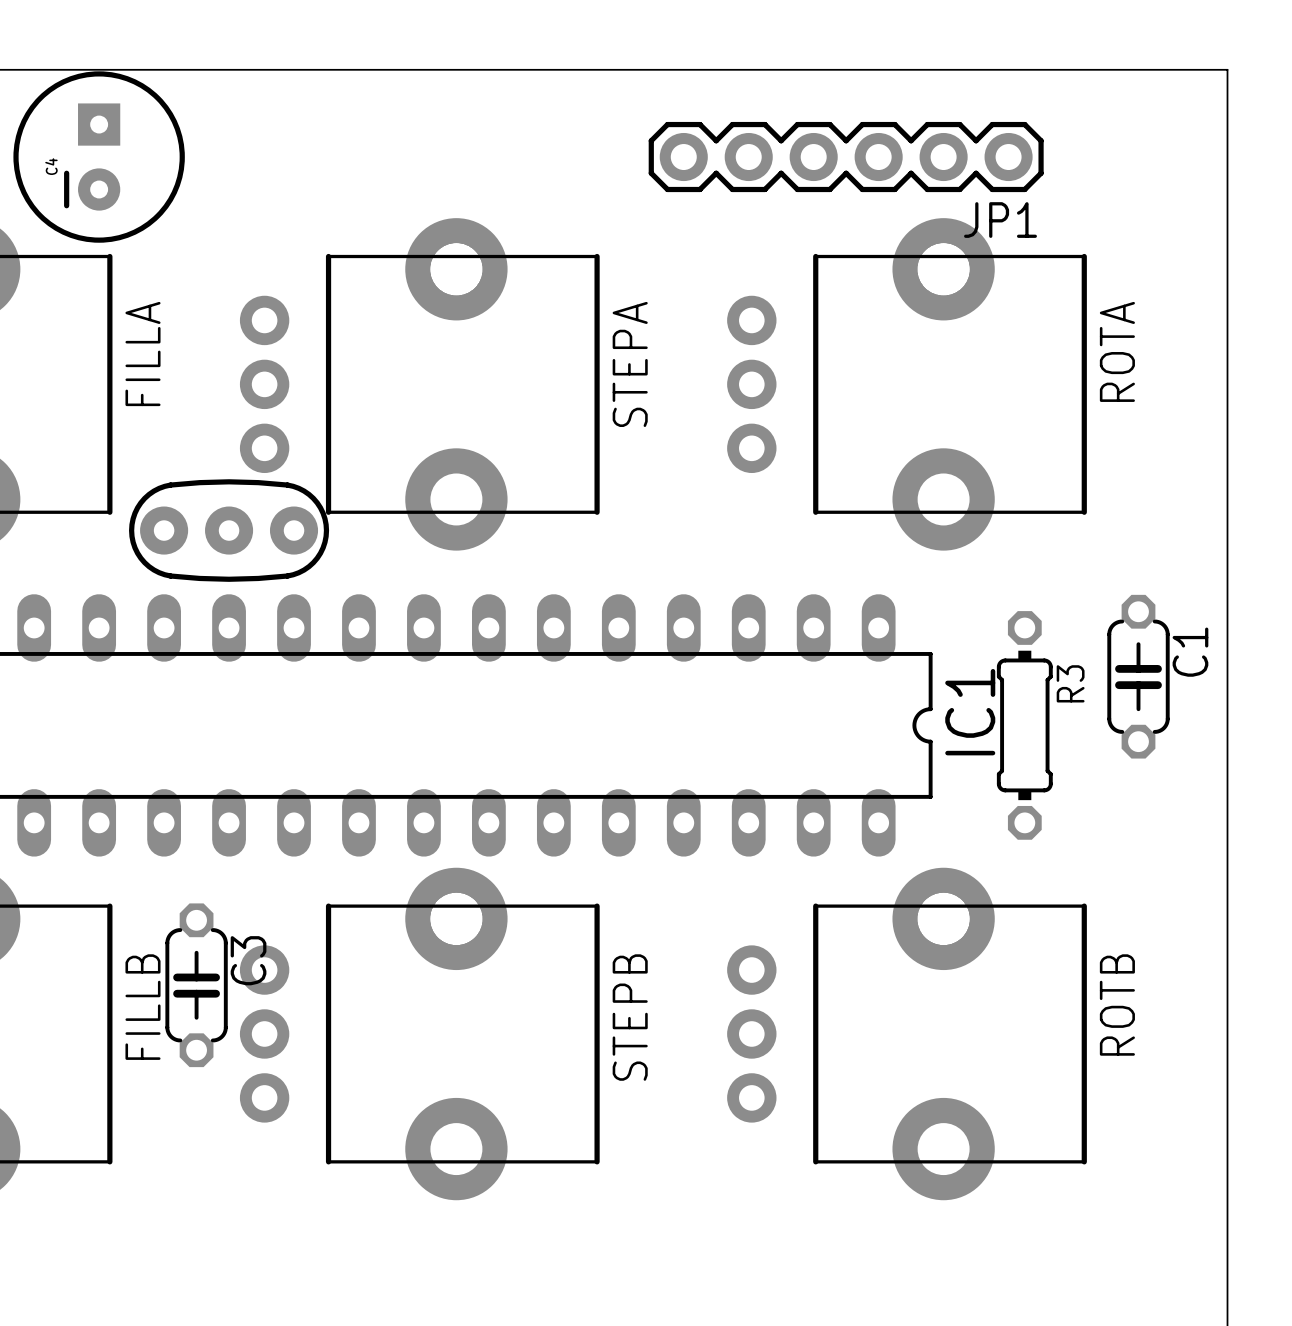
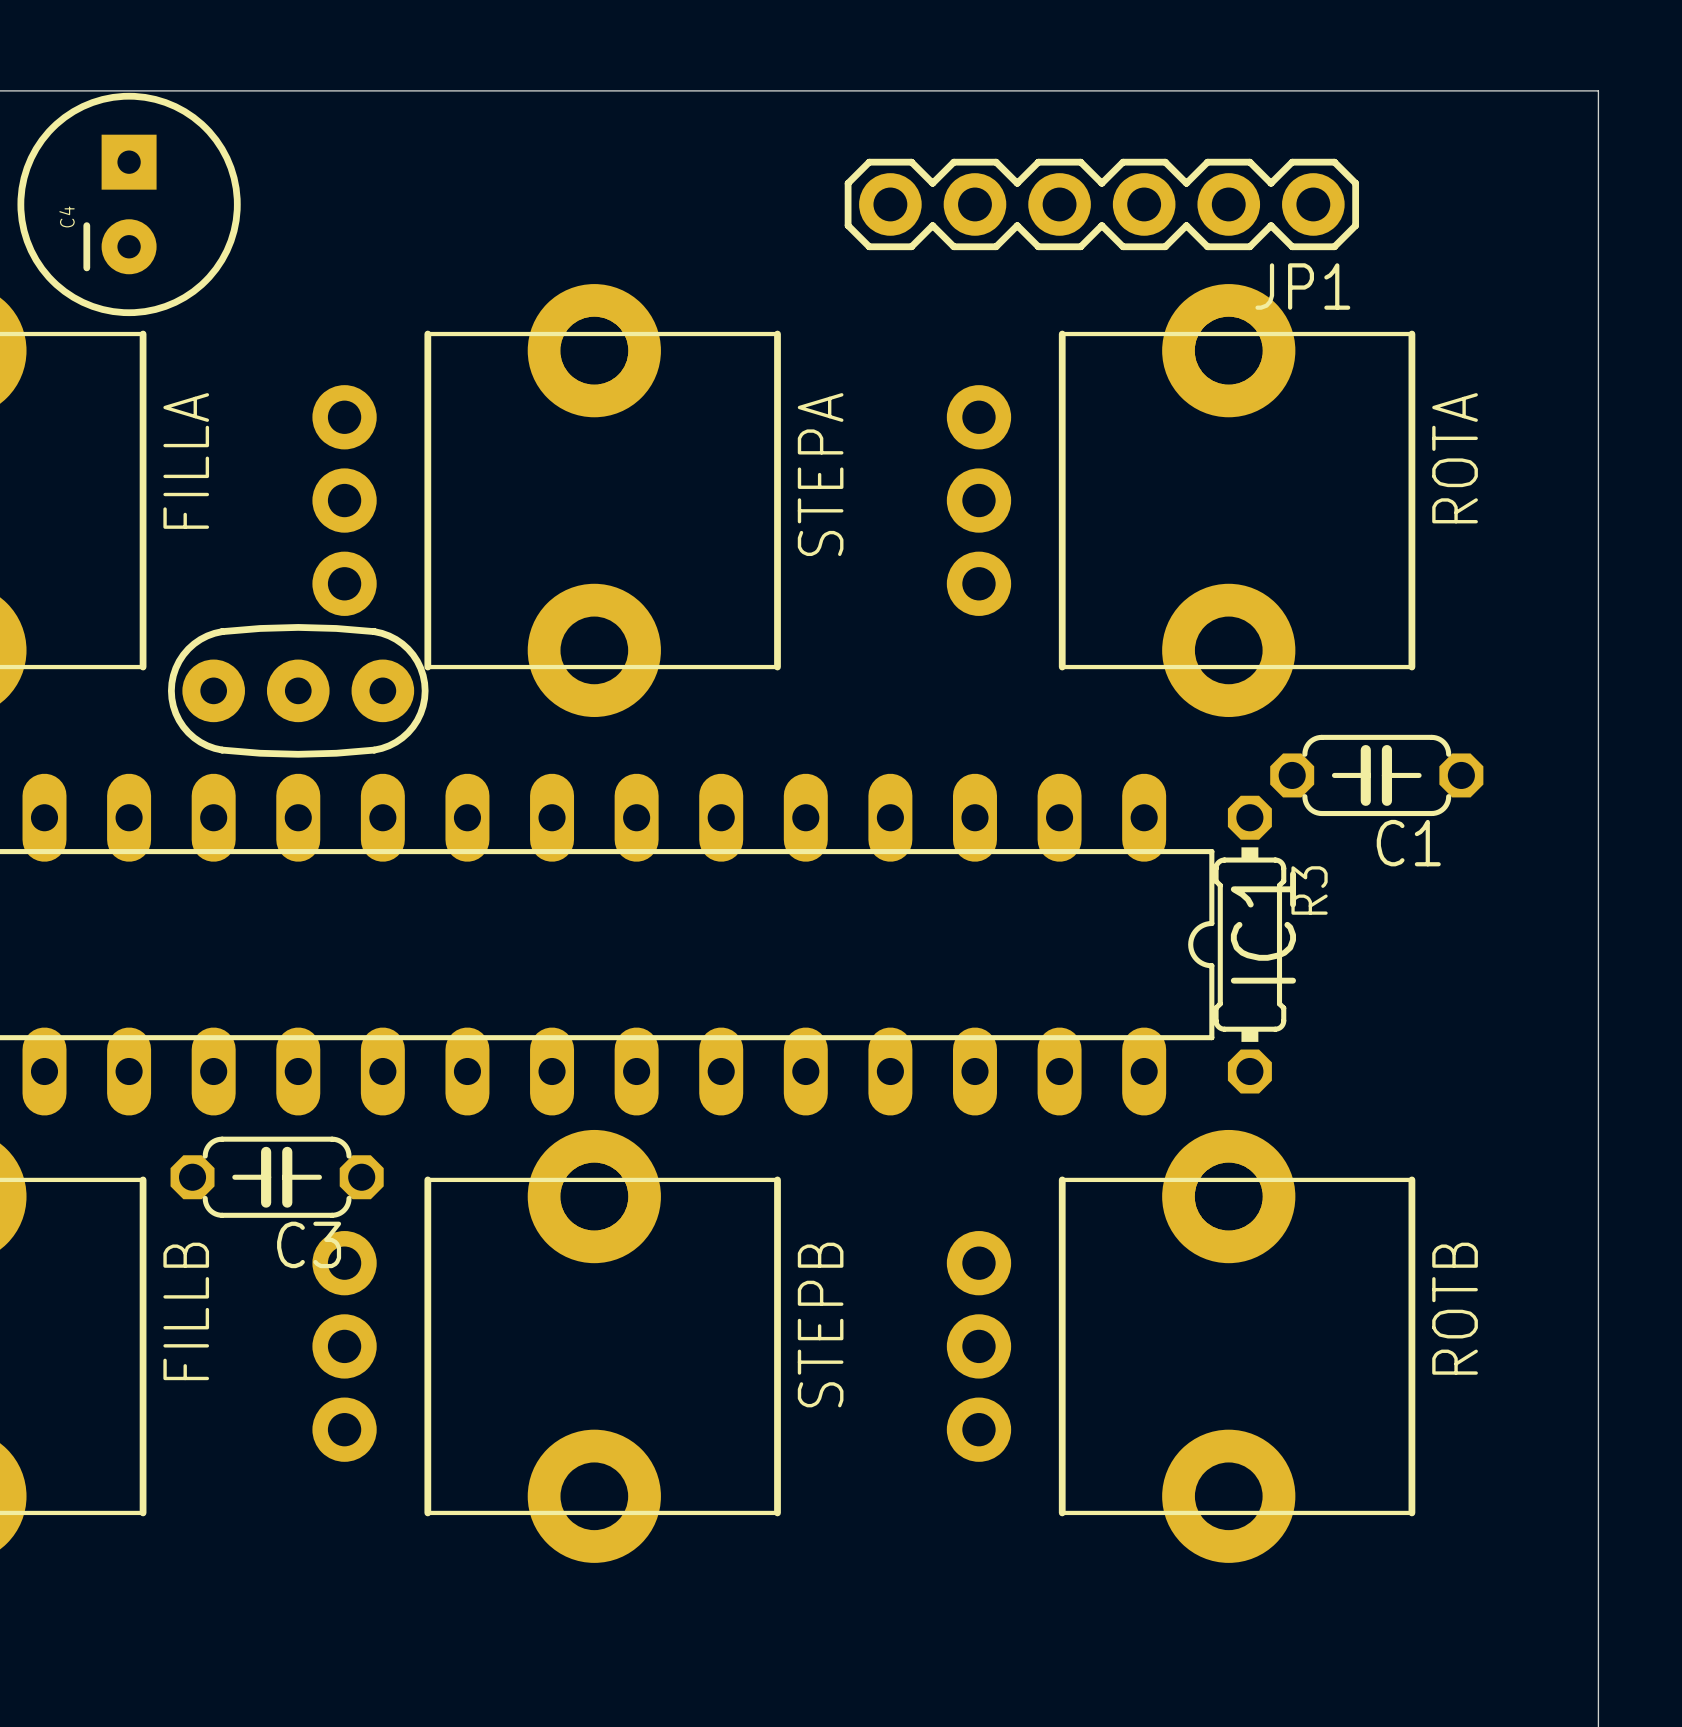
C1 rotation: 0° (1138, 676) -> 90° clockwise (1376, 775)
C1 position: (1138, 676) -> (1376, 775)
R3 position: (1024, 725) -> (1249, 944)
C3 rotation: 0° (196, 985) -> 90° clockwise (277, 1177)

